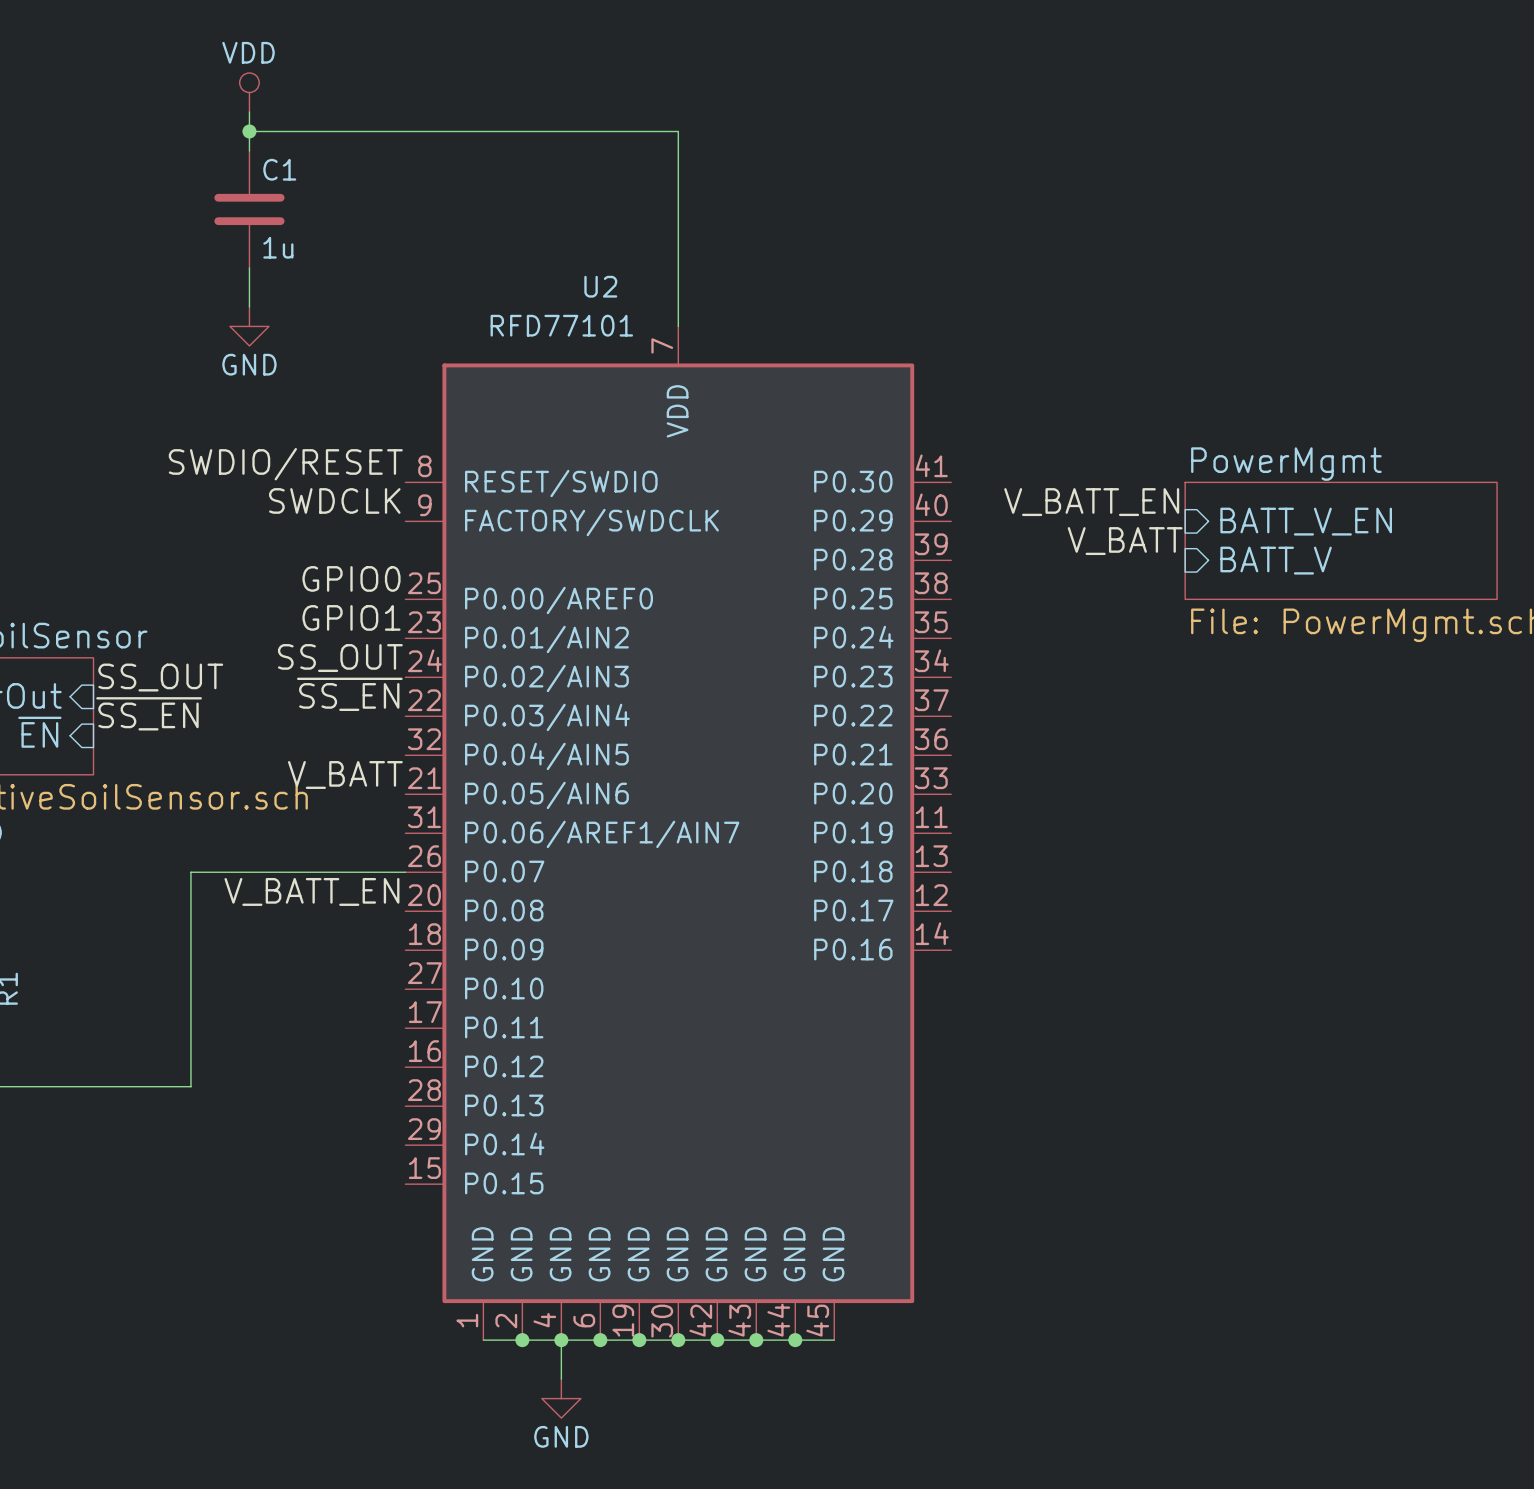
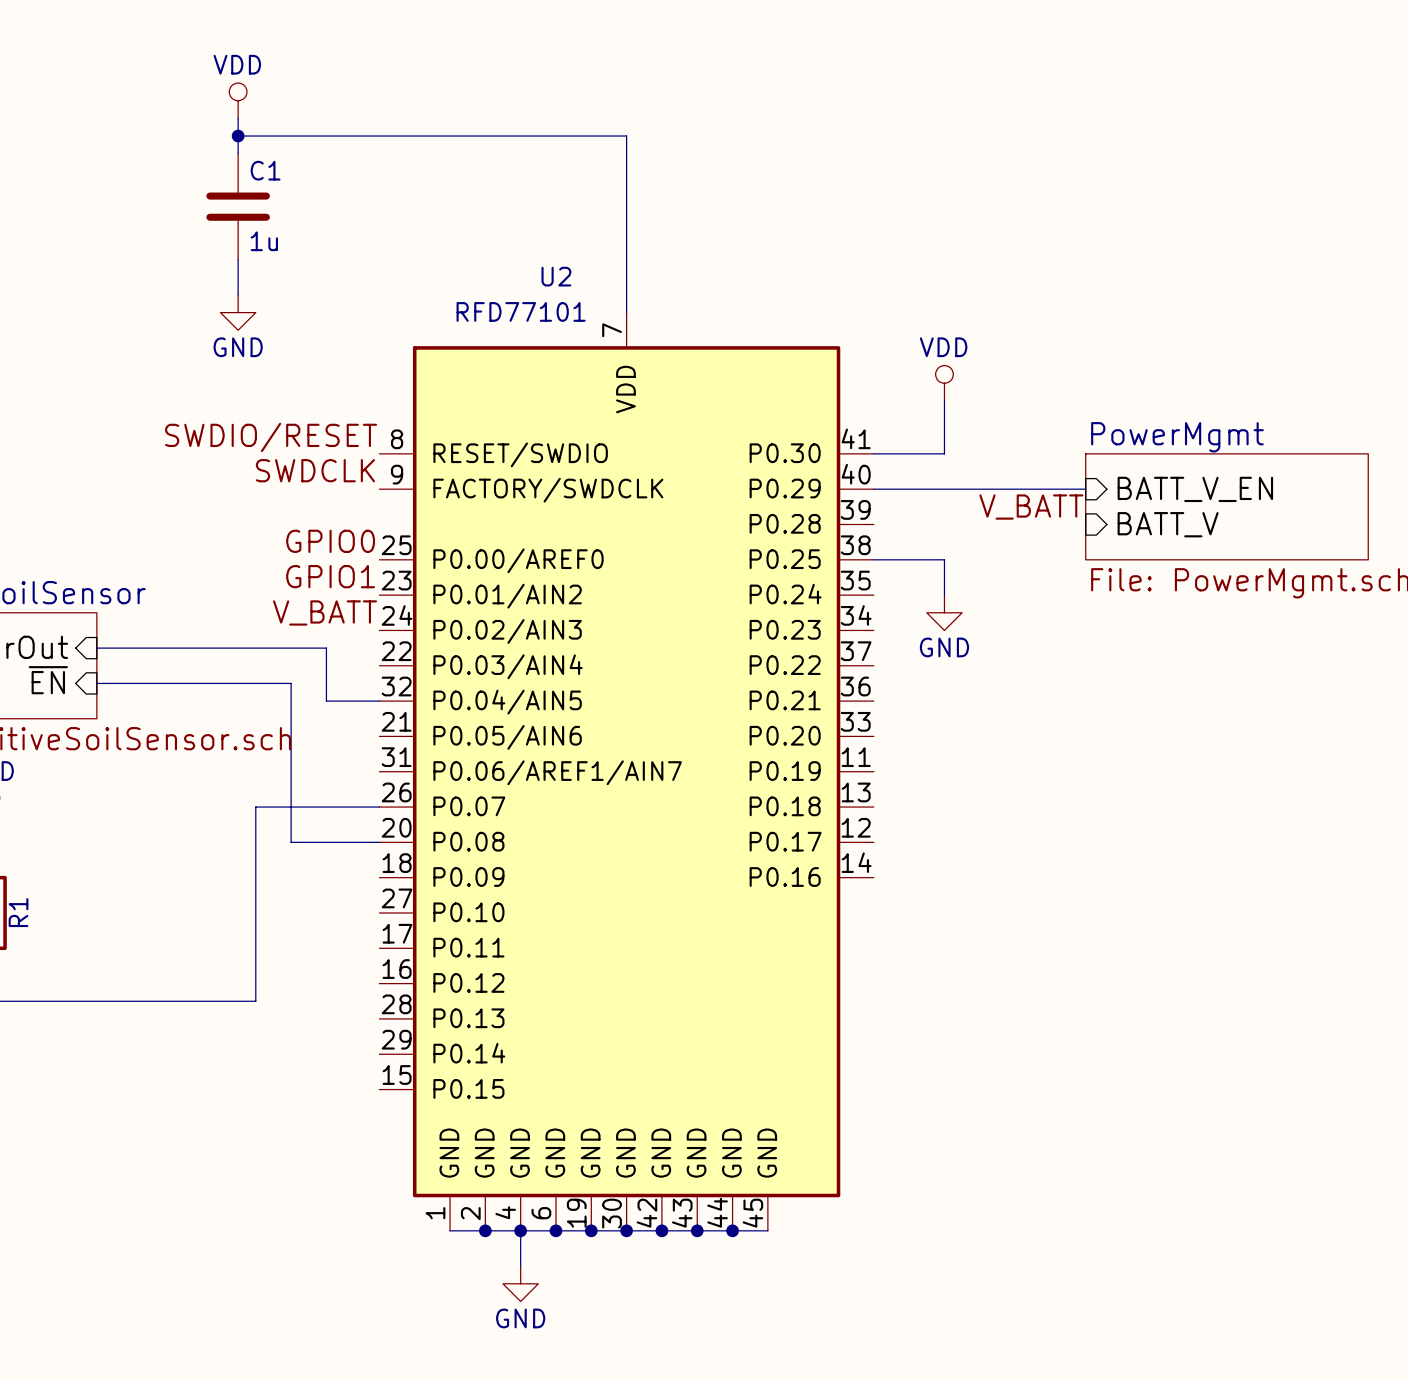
power symbol: none -> VDD (944, 383)
wire: none -> (944, 400) (944, 453) (873, 453)
label: V_BATT_EN (1091, 502) -> none
wire: none -> (873, 489) (1085, 489)
wire: none -> (873, 559) (944, 559) (944, 595)
power symbol: none -> GND (944, 612)
label: SS_OUT (340, 658) -> V_BATT (325, 612)
label: SS_OUT (160, 677) -> none
label: ~{SS_EN} (349, 694) -> none
wire: none -> (96, 648) (326, 648) (326, 701) (379, 701)
label: ~{SS_EN} (149, 713) -> none
wire: none -> (96, 683) (291, 683) (291, 842) (379, 842)
label: V_BATT (345, 774) -> none
wire: (268, 872) (190, 872) (190, 1086) -> (255, 807) (255, 1001) (185, 1001)
label: V_BATT_EN (311, 891) -> none

